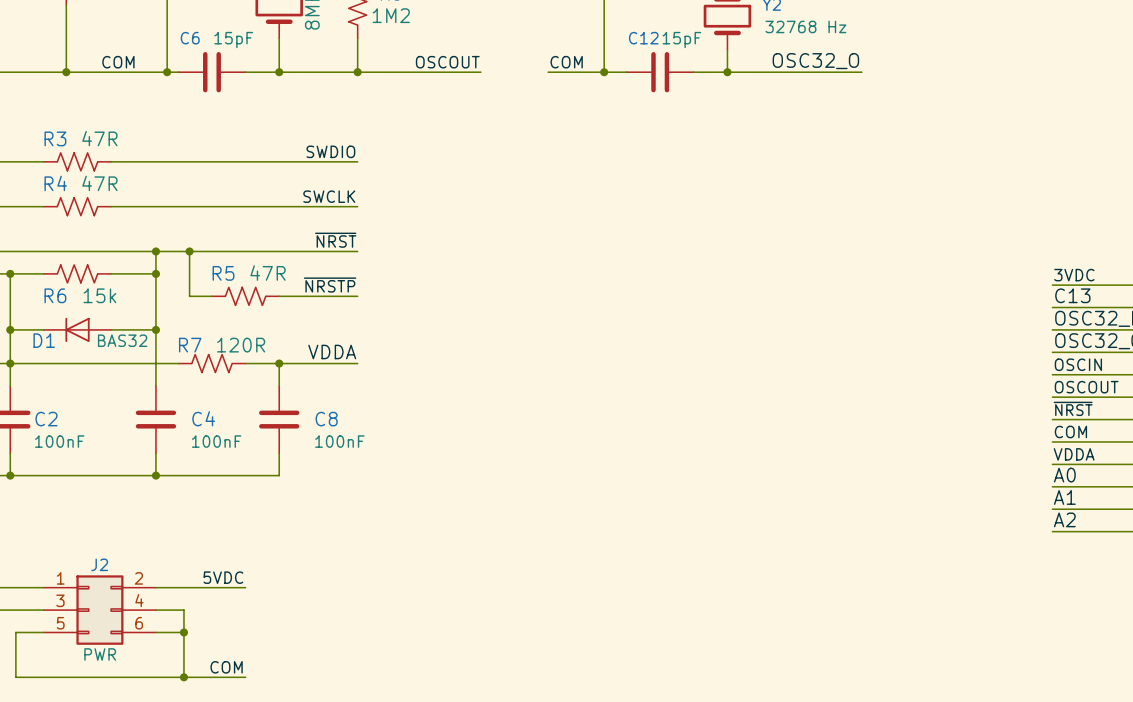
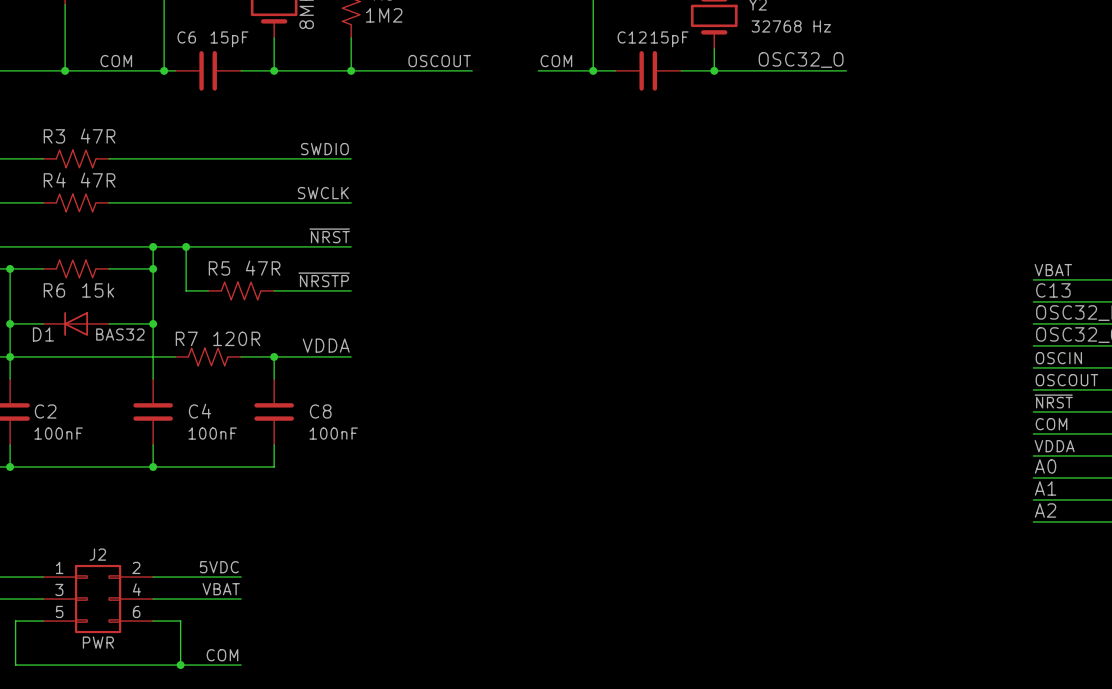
label: 3VDC (1074, 275) -> VBAT (1053, 270)
label: none -> VBAT (221, 589)
wire: (183, 610) (183, 632) -> (180, 599) (241, 599)
junction: (183, 632) -> none

